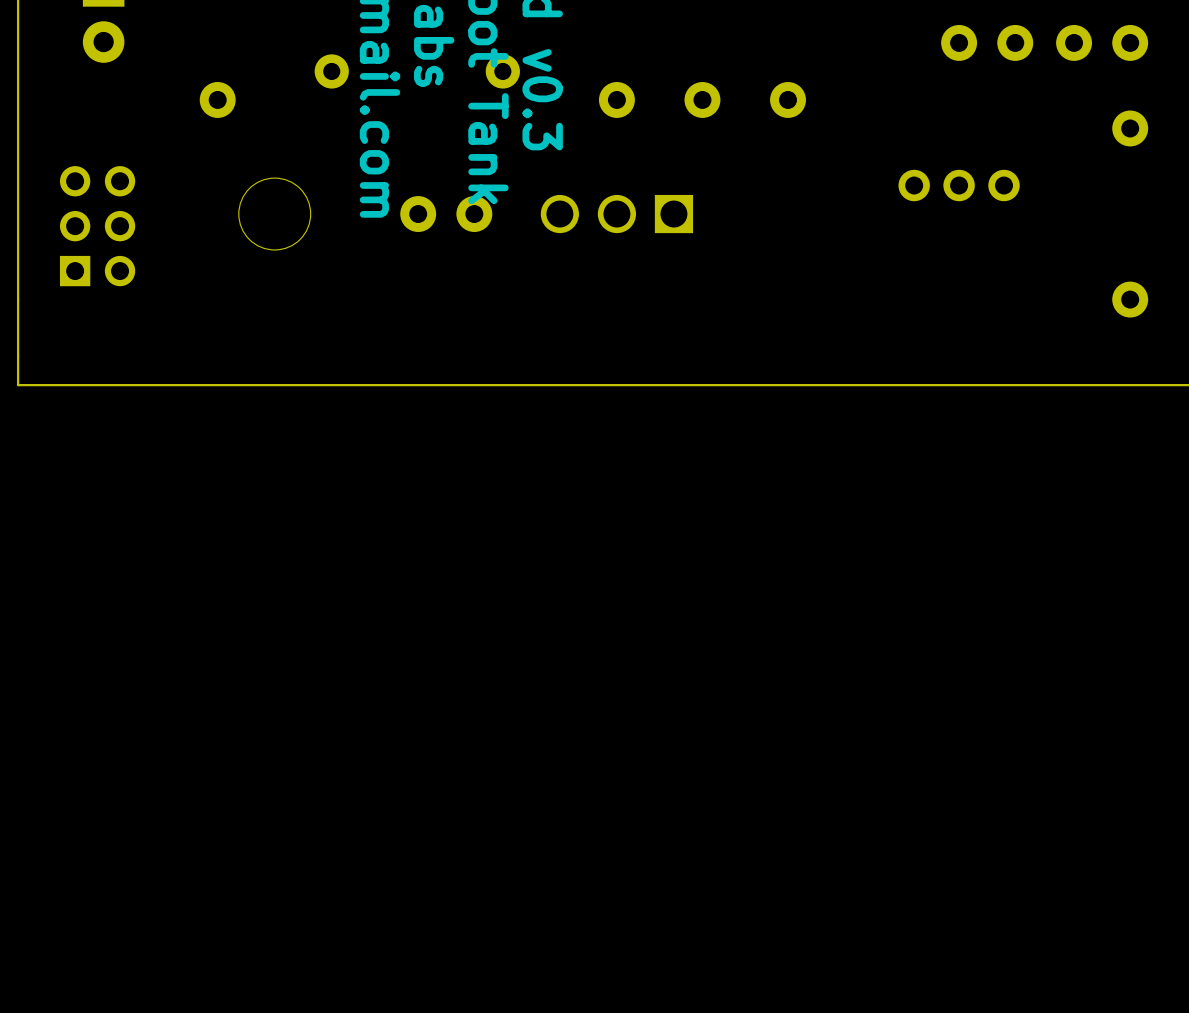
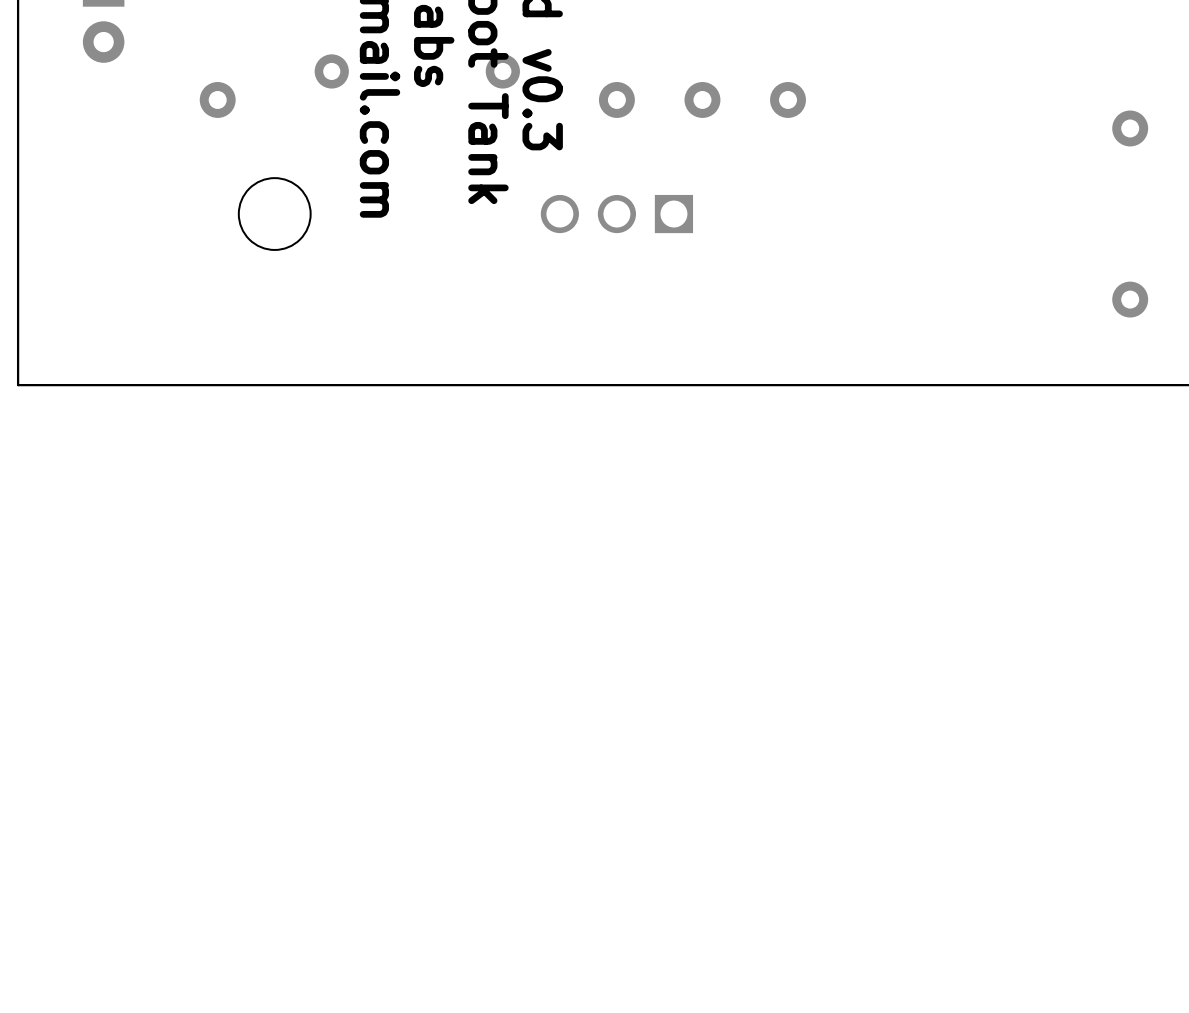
part: (987, 42) -> none
part: (1102, 42) -> none
part: (959, 185) -> none
part: (446, 214) -> none
part: (97, 226) -> none

